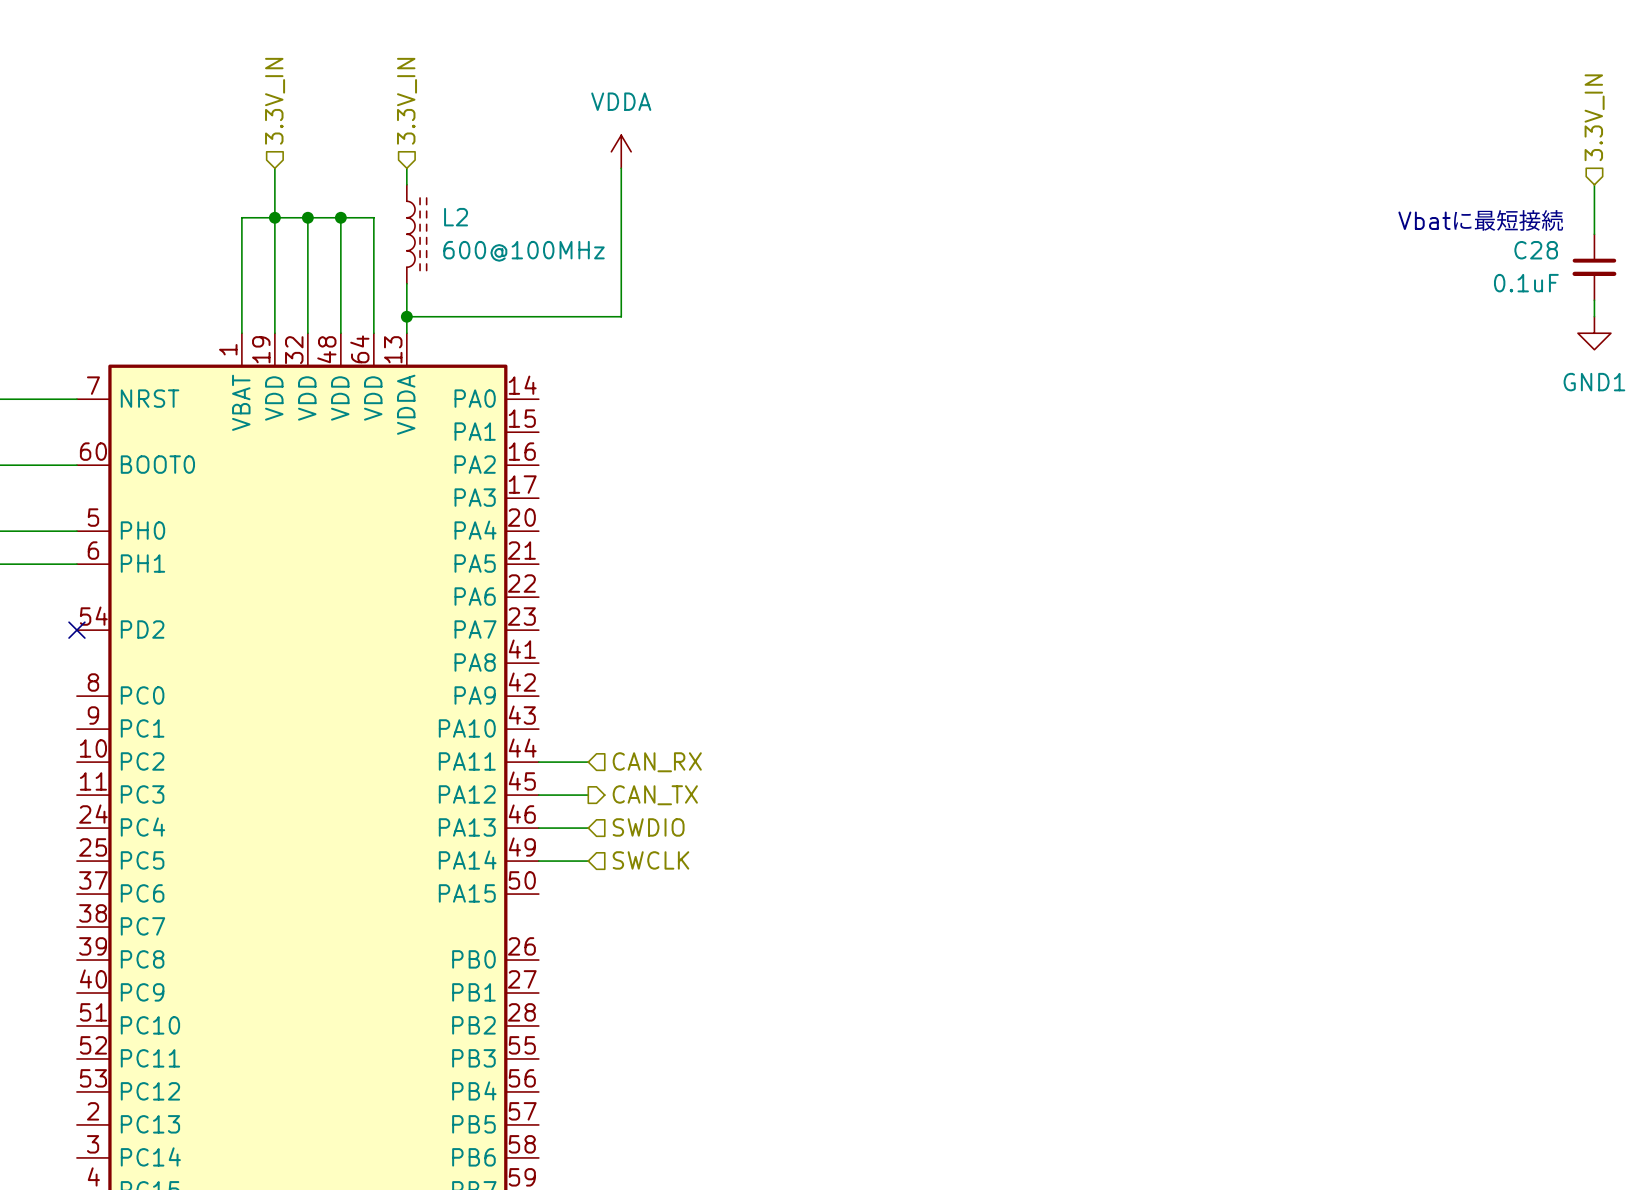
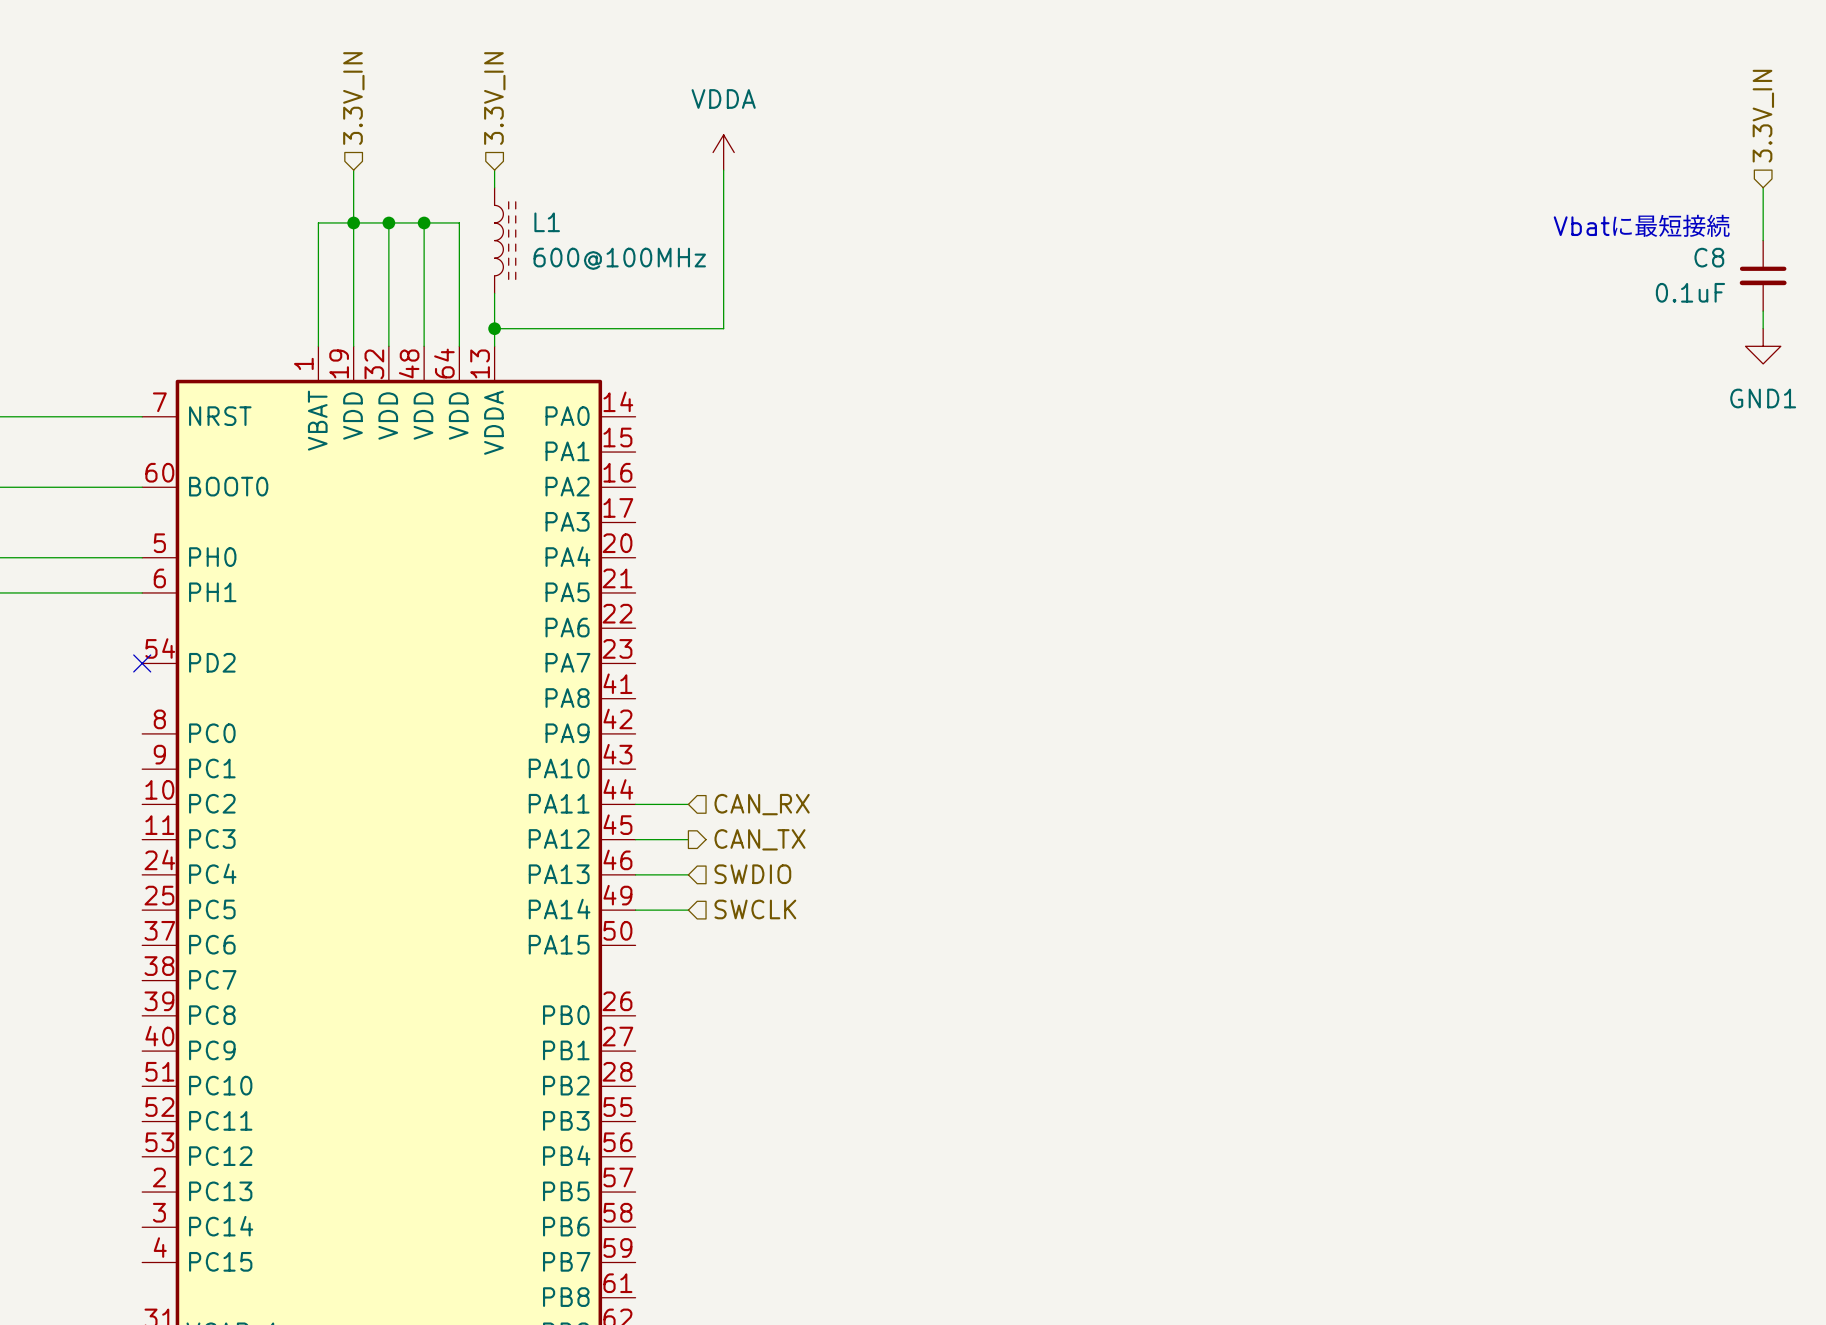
L2 name: L2 (456, 217) -> L1 (547, 222)
C28 name: C28 (1536, 250) -> C8 (1709, 257)

